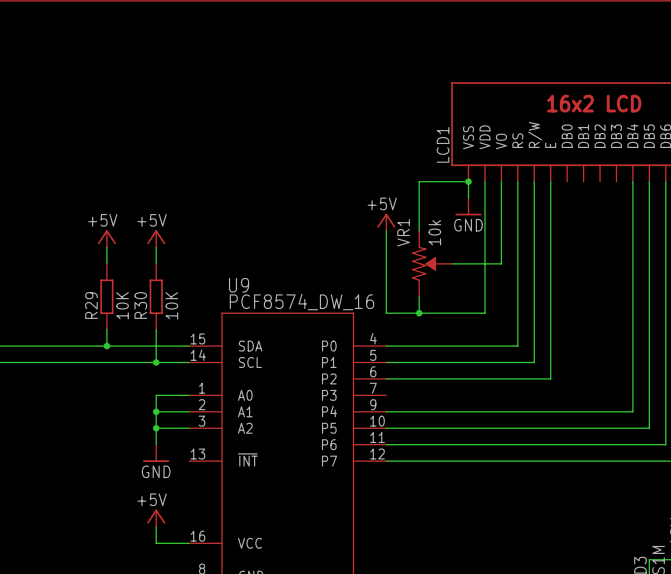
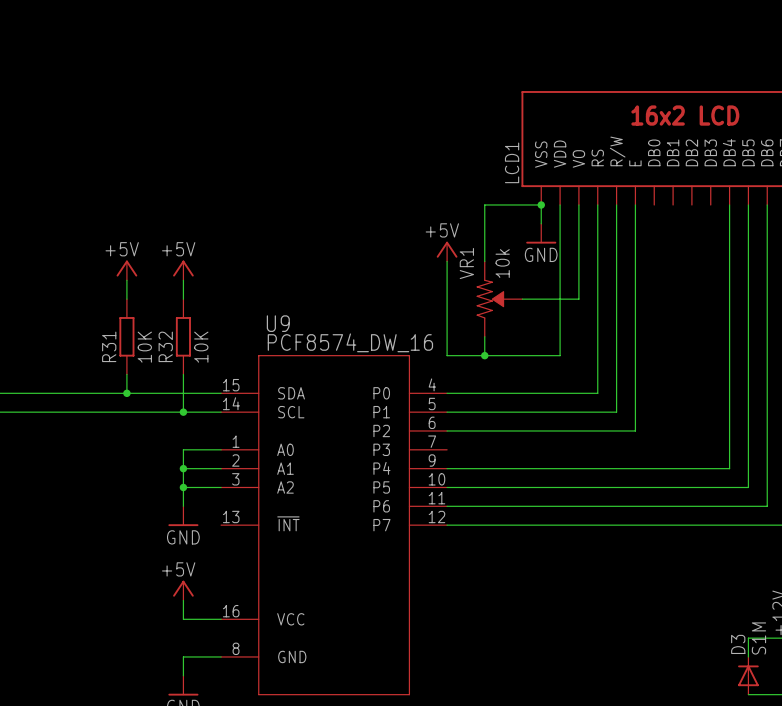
R29 name: R29 (91, 305) -> R31 (109, 346)
R30 name: R30 (140, 305) -> R32 (165, 346)

